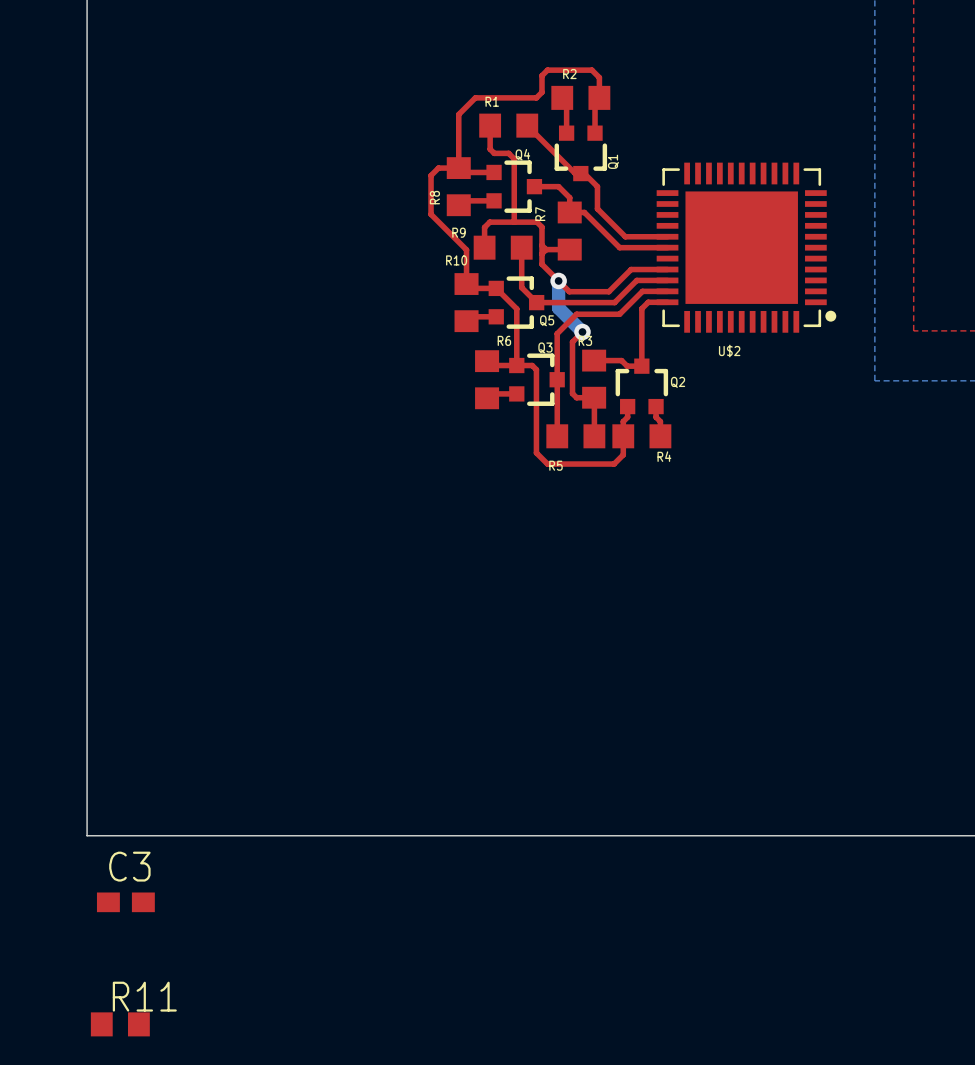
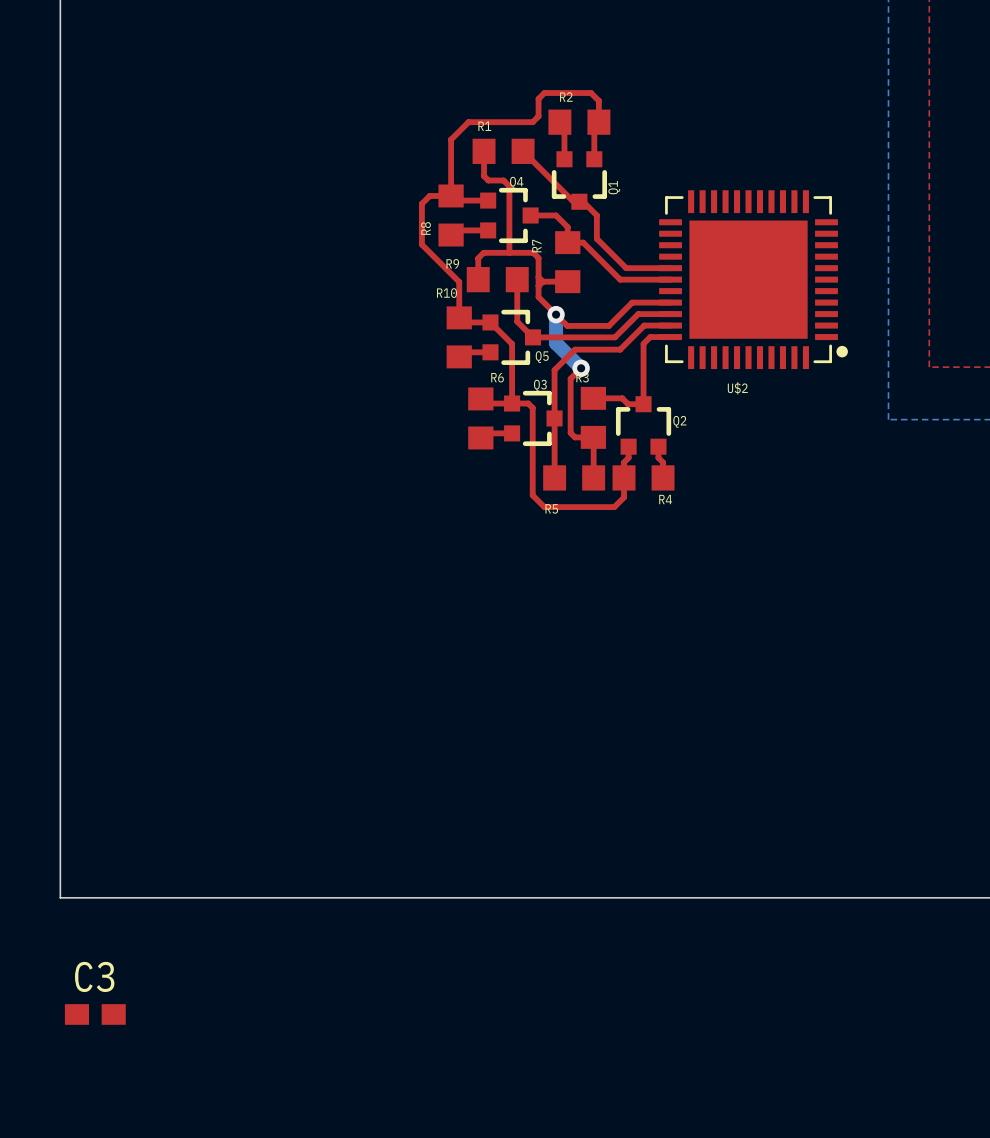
C3 position: (125, 902) -> (95, 1014)
R11: (120, 1024) -> none

